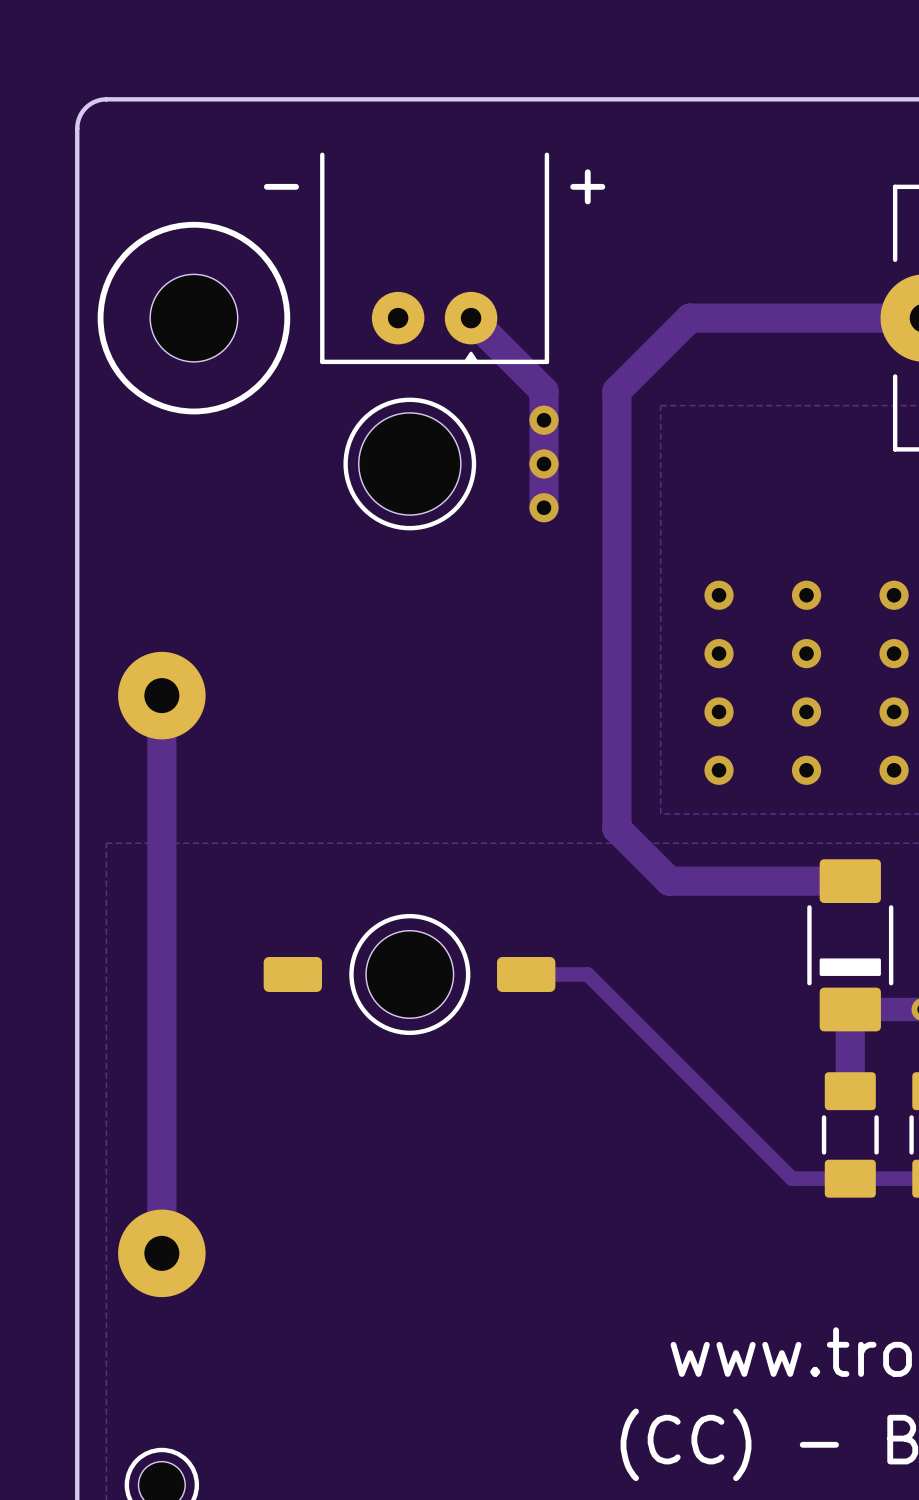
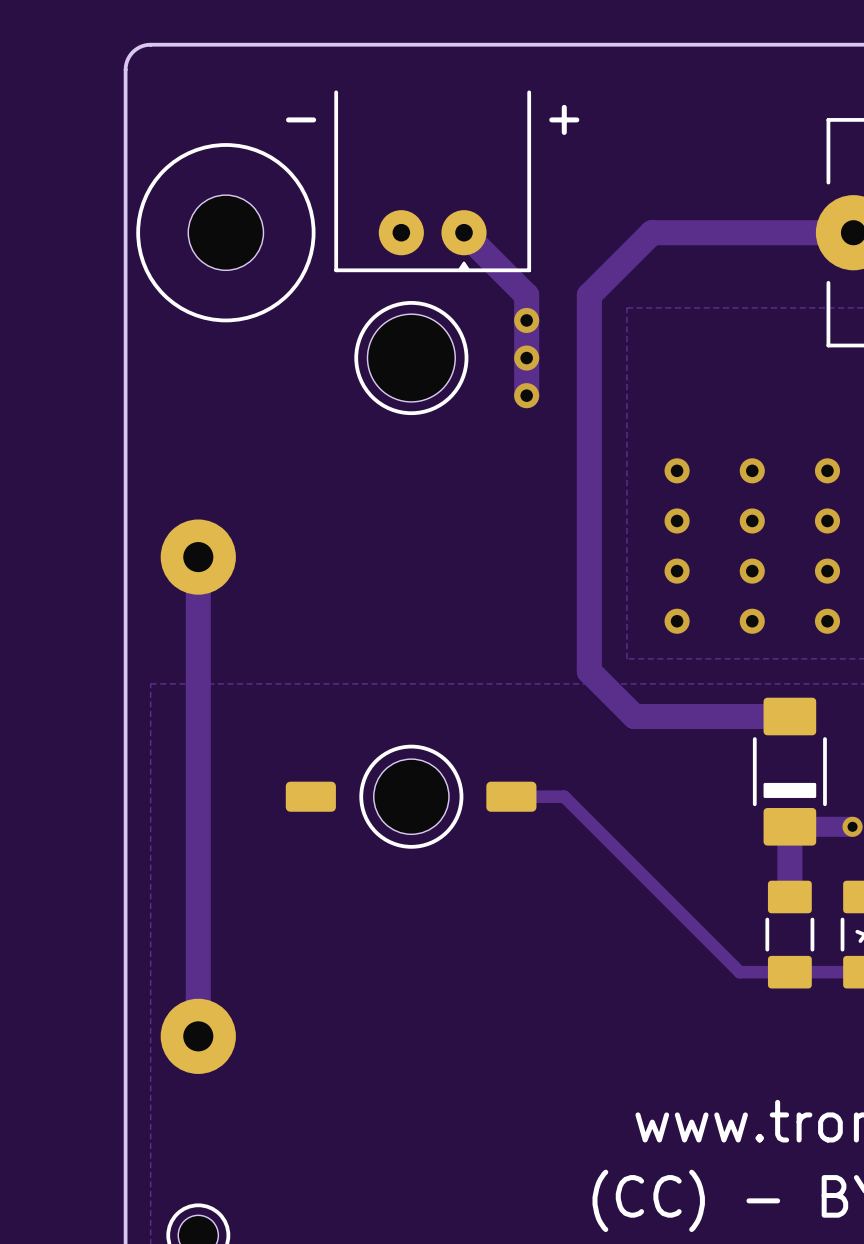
part footprint: [97, 221, 291, 415] -> [136, 143, 316, 323]

